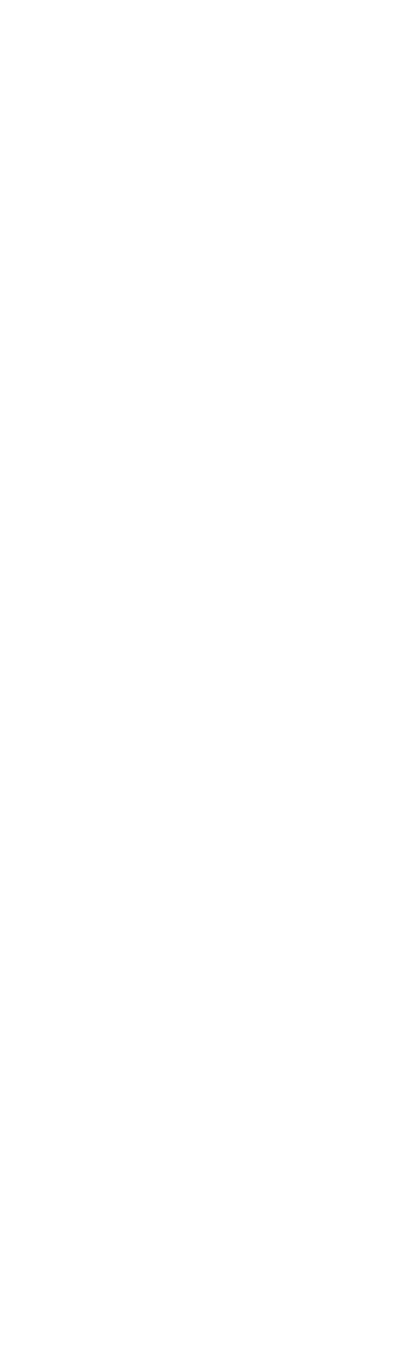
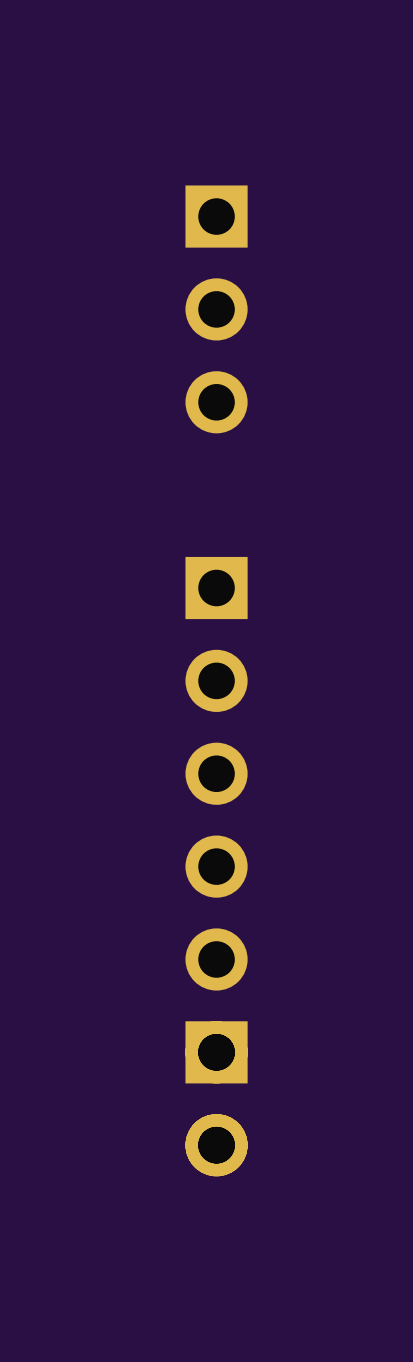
part: none -> (216, 309)
part: none -> (216, 866)
part: none -> (216, 1098)

